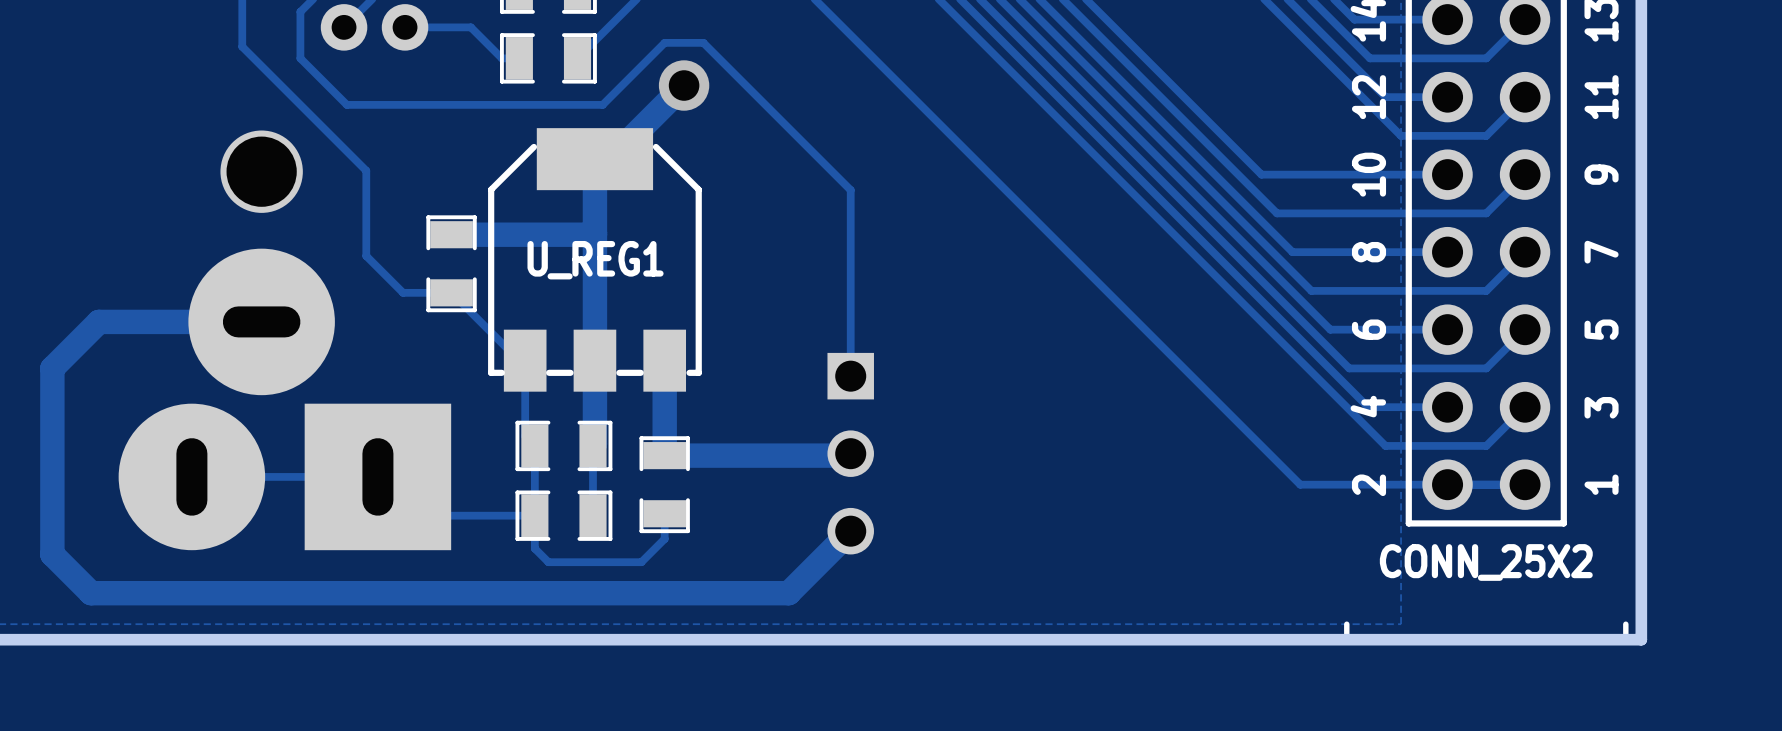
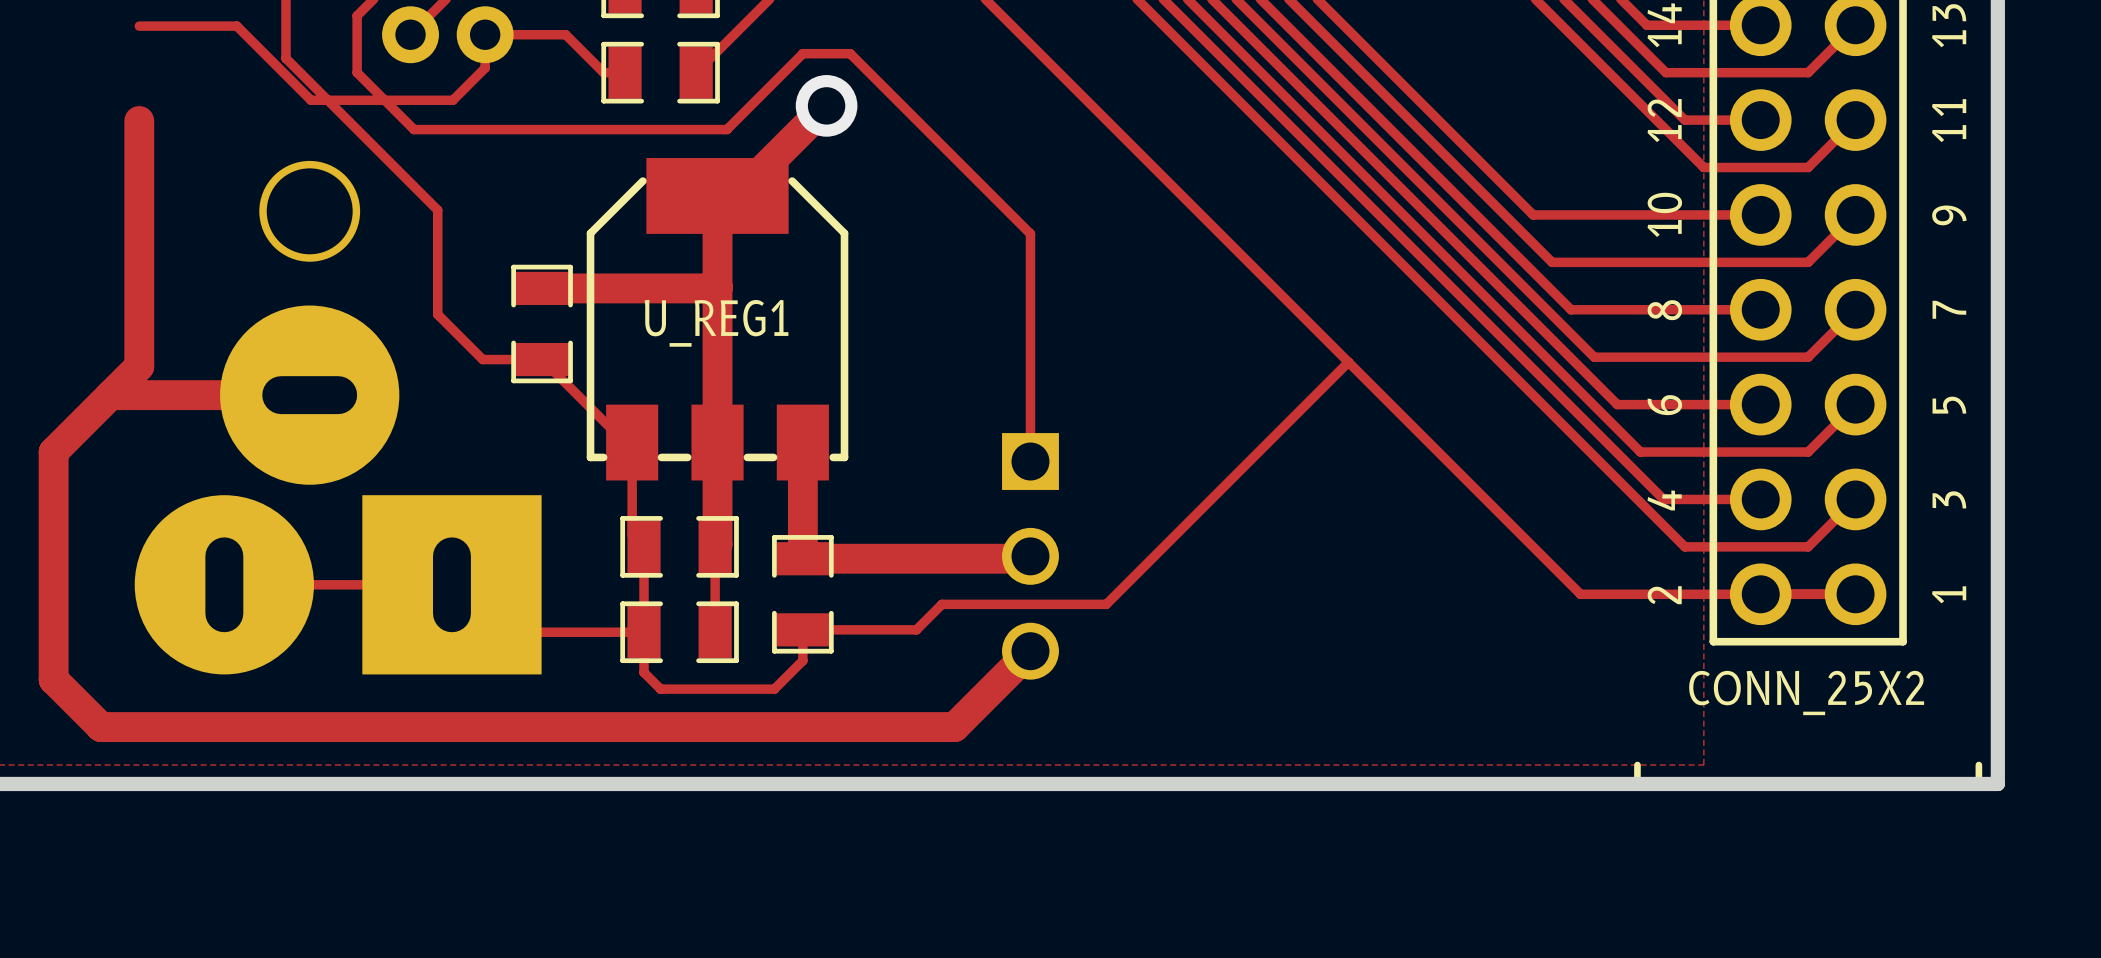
track: none -> (139, 26) (236, 26) (311, 100) (452, 100) (485, 68) (485, 34)
track: none -> (139, 120) (139, 366) (110, 395)
track: none -> (1348, 362) (1106, 604) (942, 604) (916, 629) (802, 629)

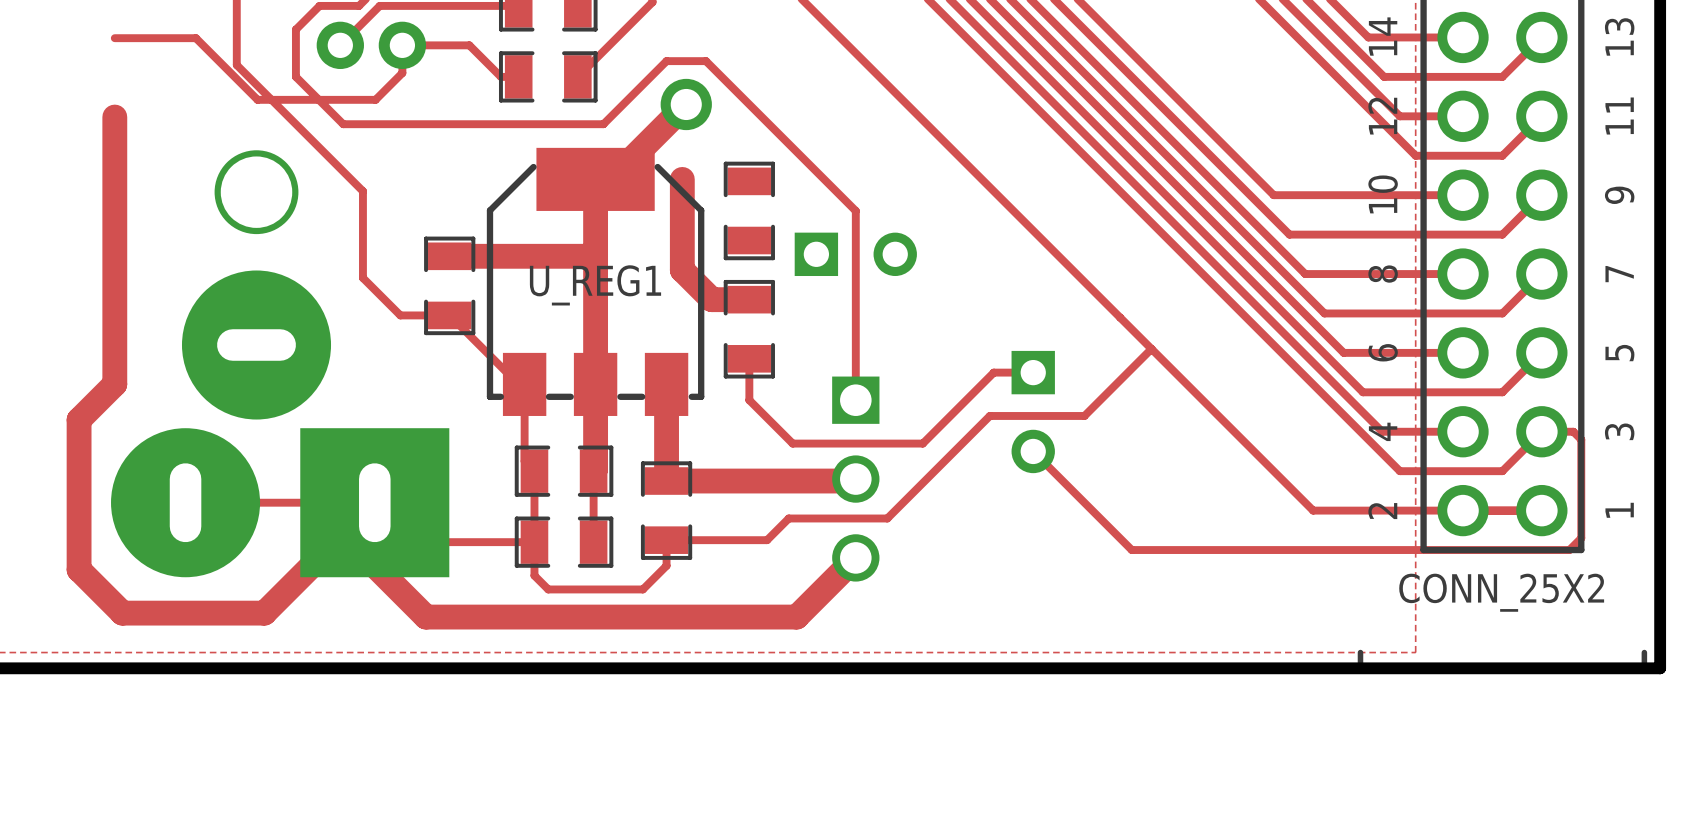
track: none -> (682, 179) (682, 270) (711, 299) (749, 299)
part: none -> (749, 210)
part: none -> (855, 254)
track: (1348, 362) (1106, 604) (942, 604) (916, 629) -> (1151, 348) (1084, 415) (989, 415) (887, 518) (788, 518) (767, 540) (761, 540)
track: (139, 366) (53, 452) (53, 679) (101, 727) (954, 727) (959, 722) -> (114, 321) (114, 384) (79, 419) (79, 569) (122, 613) (264, 613) (374, 502) (374, 565) (426, 617) (796, 617)
part: none -> (749, 329)
track: (110, 395) (309, 395) -> none
track: none -> (749, 358) (749, 400) (792, 443) (922, 443) (993, 372) (1033, 372)
part: none -> (1033, 412)
track: none -> (1541, 431) (1573, 431) (1581, 439) (1581, 538) (1569, 550) (1131, 550) (1033, 451)

